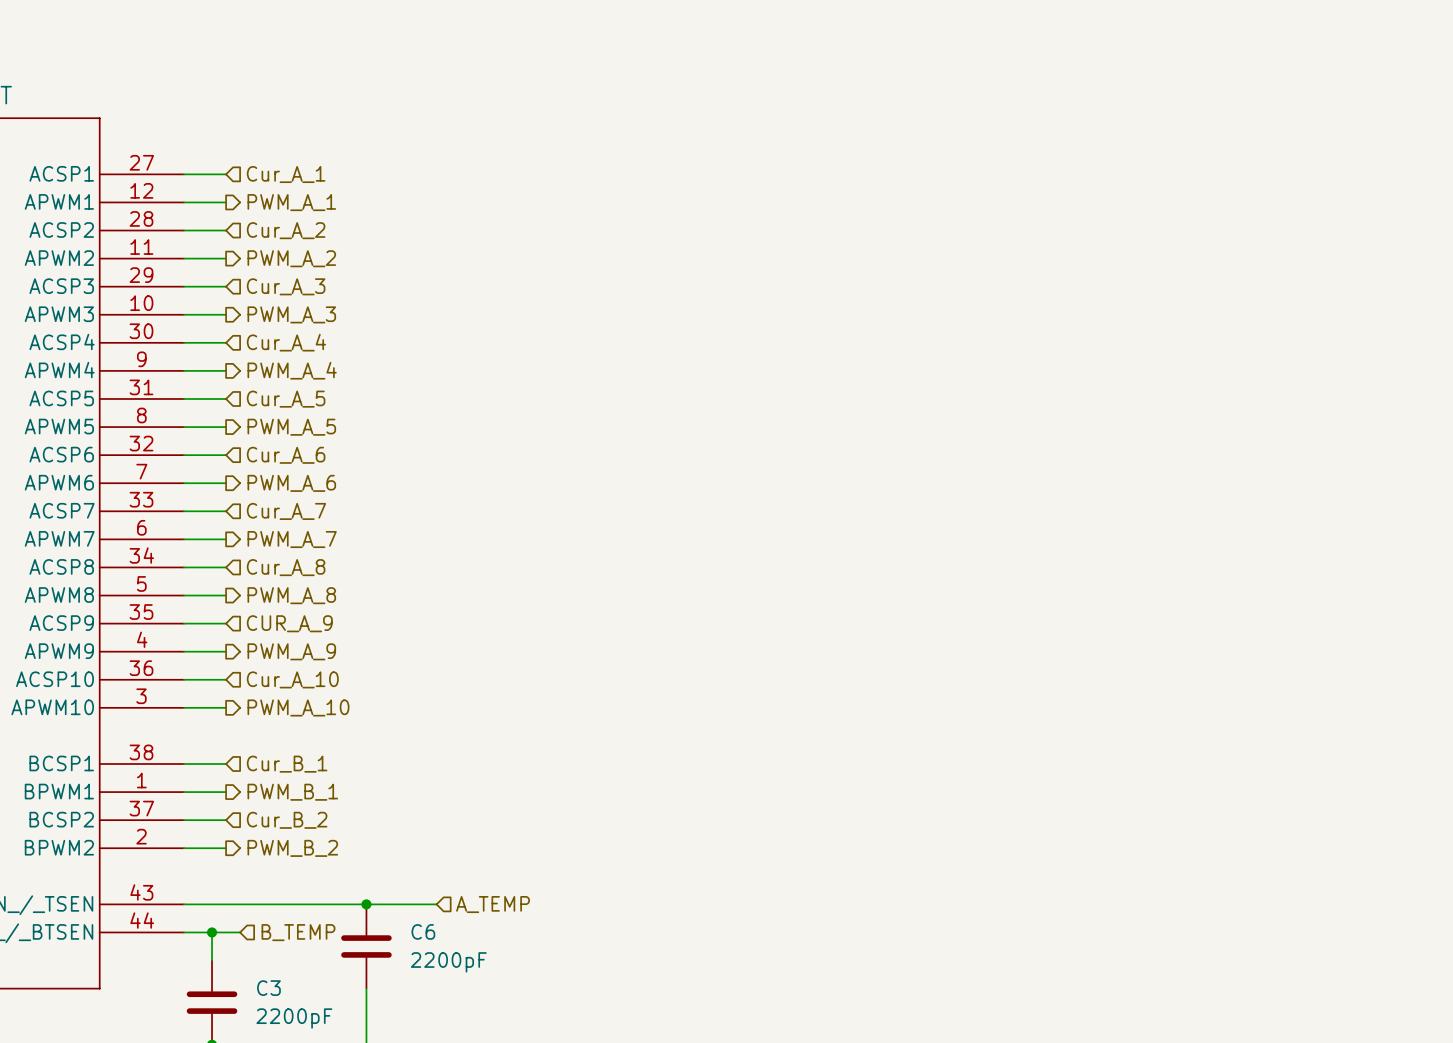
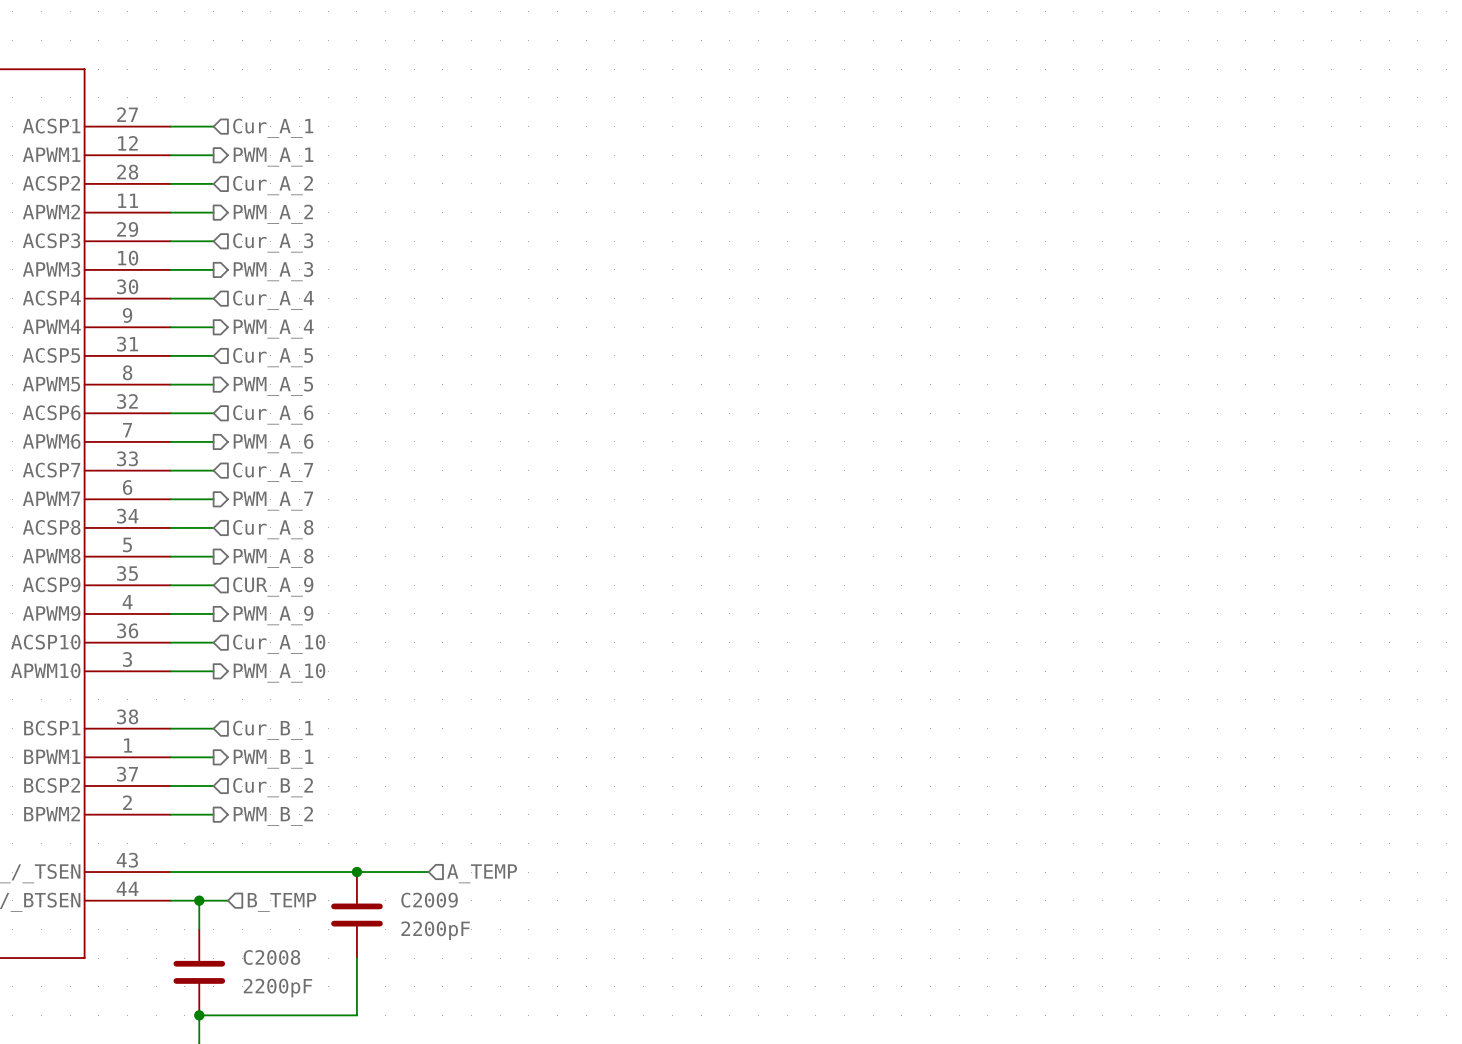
C6 name: C6 (423, 931) -> C2009 (429, 900)
C3 name: C3 (268, 988) -> C2008 (271, 957)

